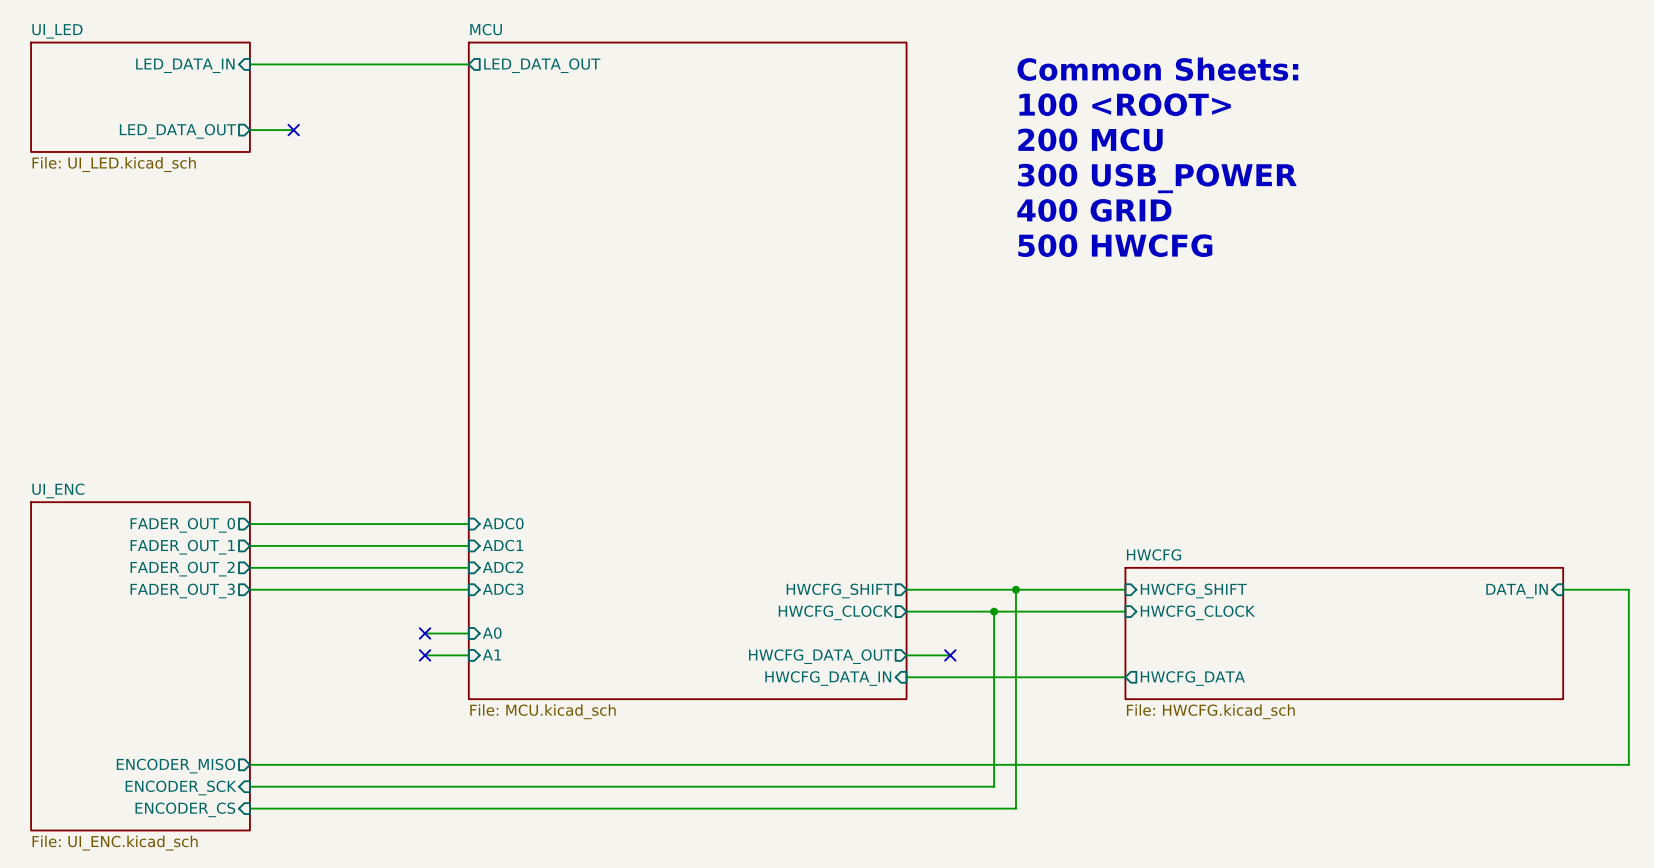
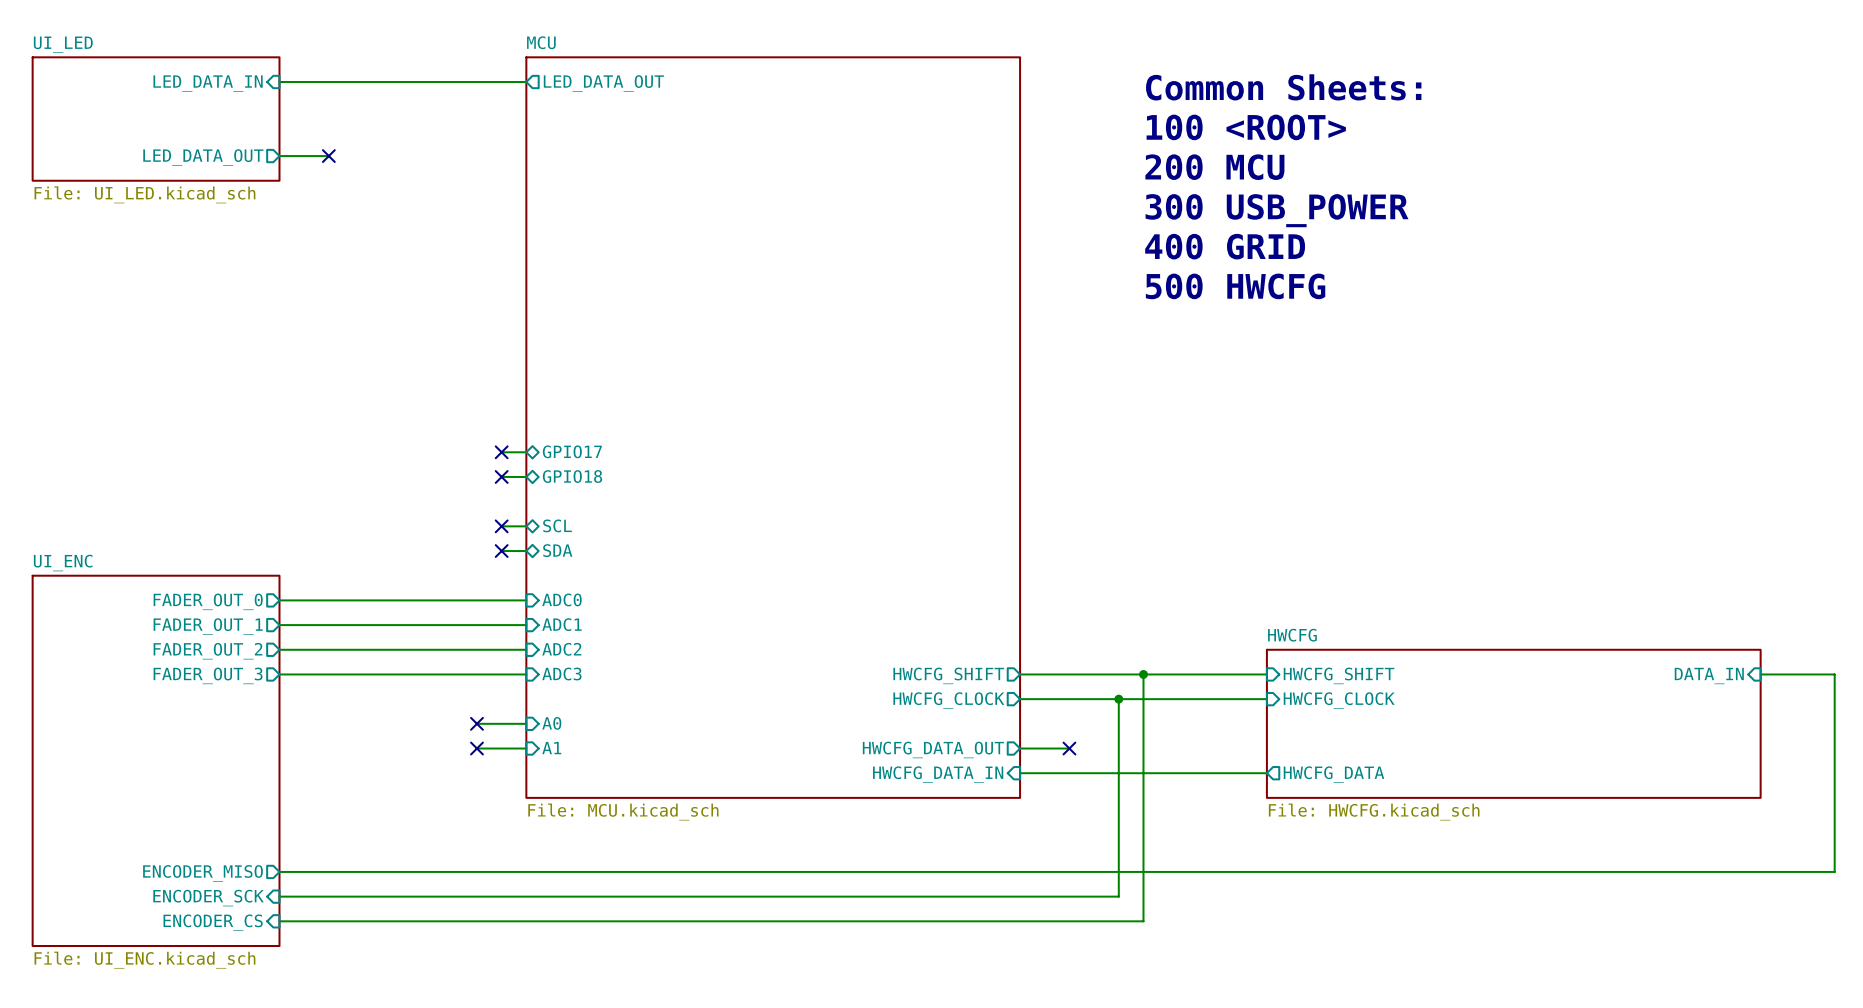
wire: none -> (501, 452) (526, 452)
no-connect mark: none -> (501, 452)
sheet pin: none -> GPIO17 (572, 451)
wire: none -> (501, 476) (526, 476)
no-connect mark: none -> (501, 476)
sheet pin: none -> GPIO18 (572, 476)
wire: none -> (501, 526) (526, 526)
no-connect mark: none -> (501, 526)
sheet pin: none -> SCL (557, 525)
sheet pin: none -> SDA (557, 550)
wire: none -> (501, 551) (526, 551)
no-connect mark: none -> (501, 551)

